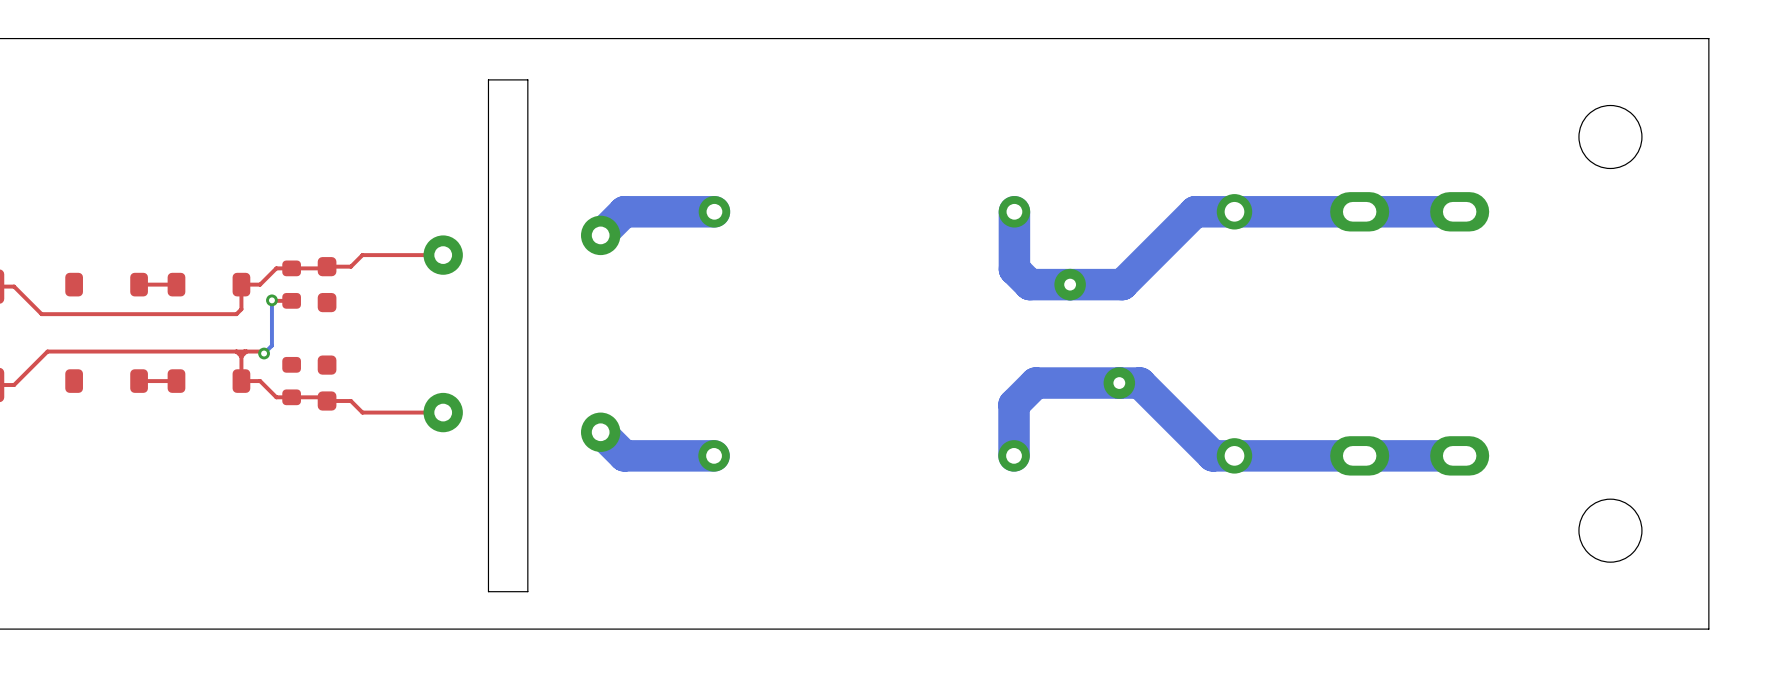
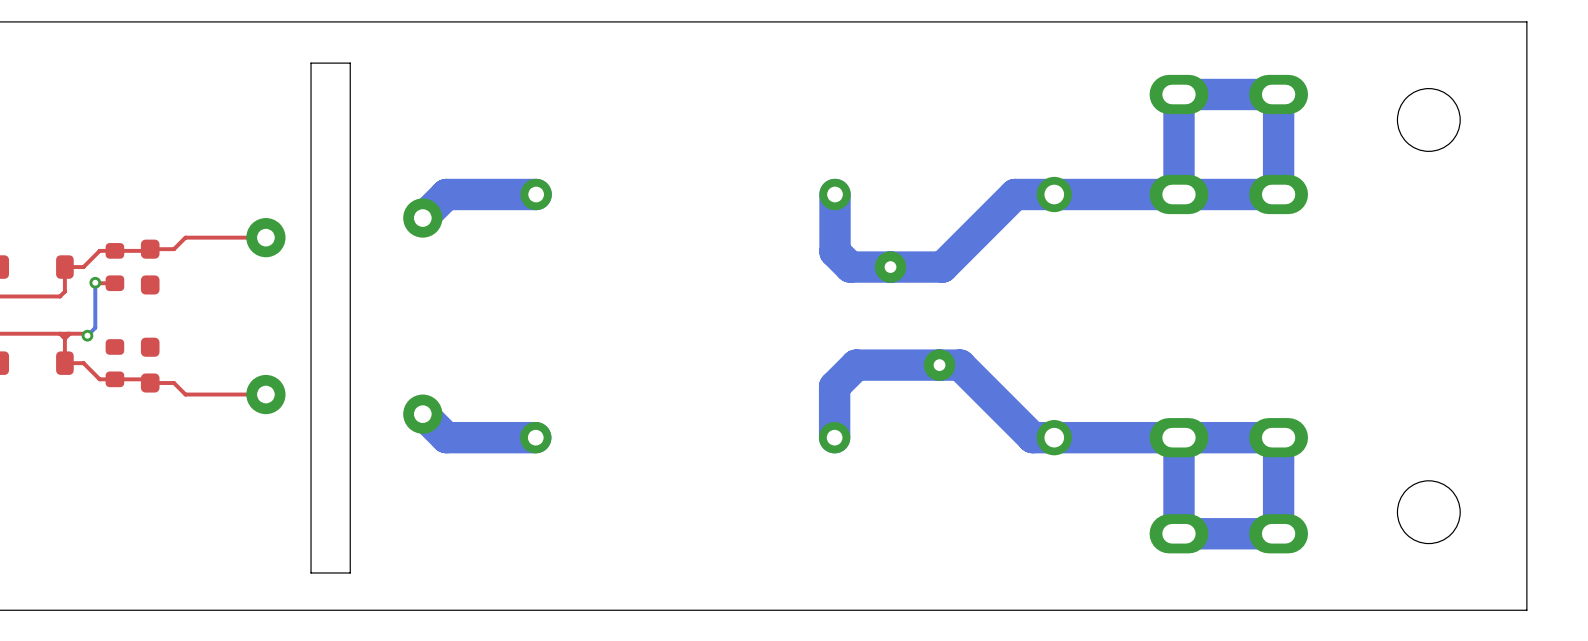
part: none -> (1228, 94)
bottom track: none -> (1278, 194) (1278, 94) (1178, 94) (1178, 194)
bottom track: none -> (1278, 437) (1278, 533) (1178, 533) (1178, 437)
part: none -> (1228, 533)

